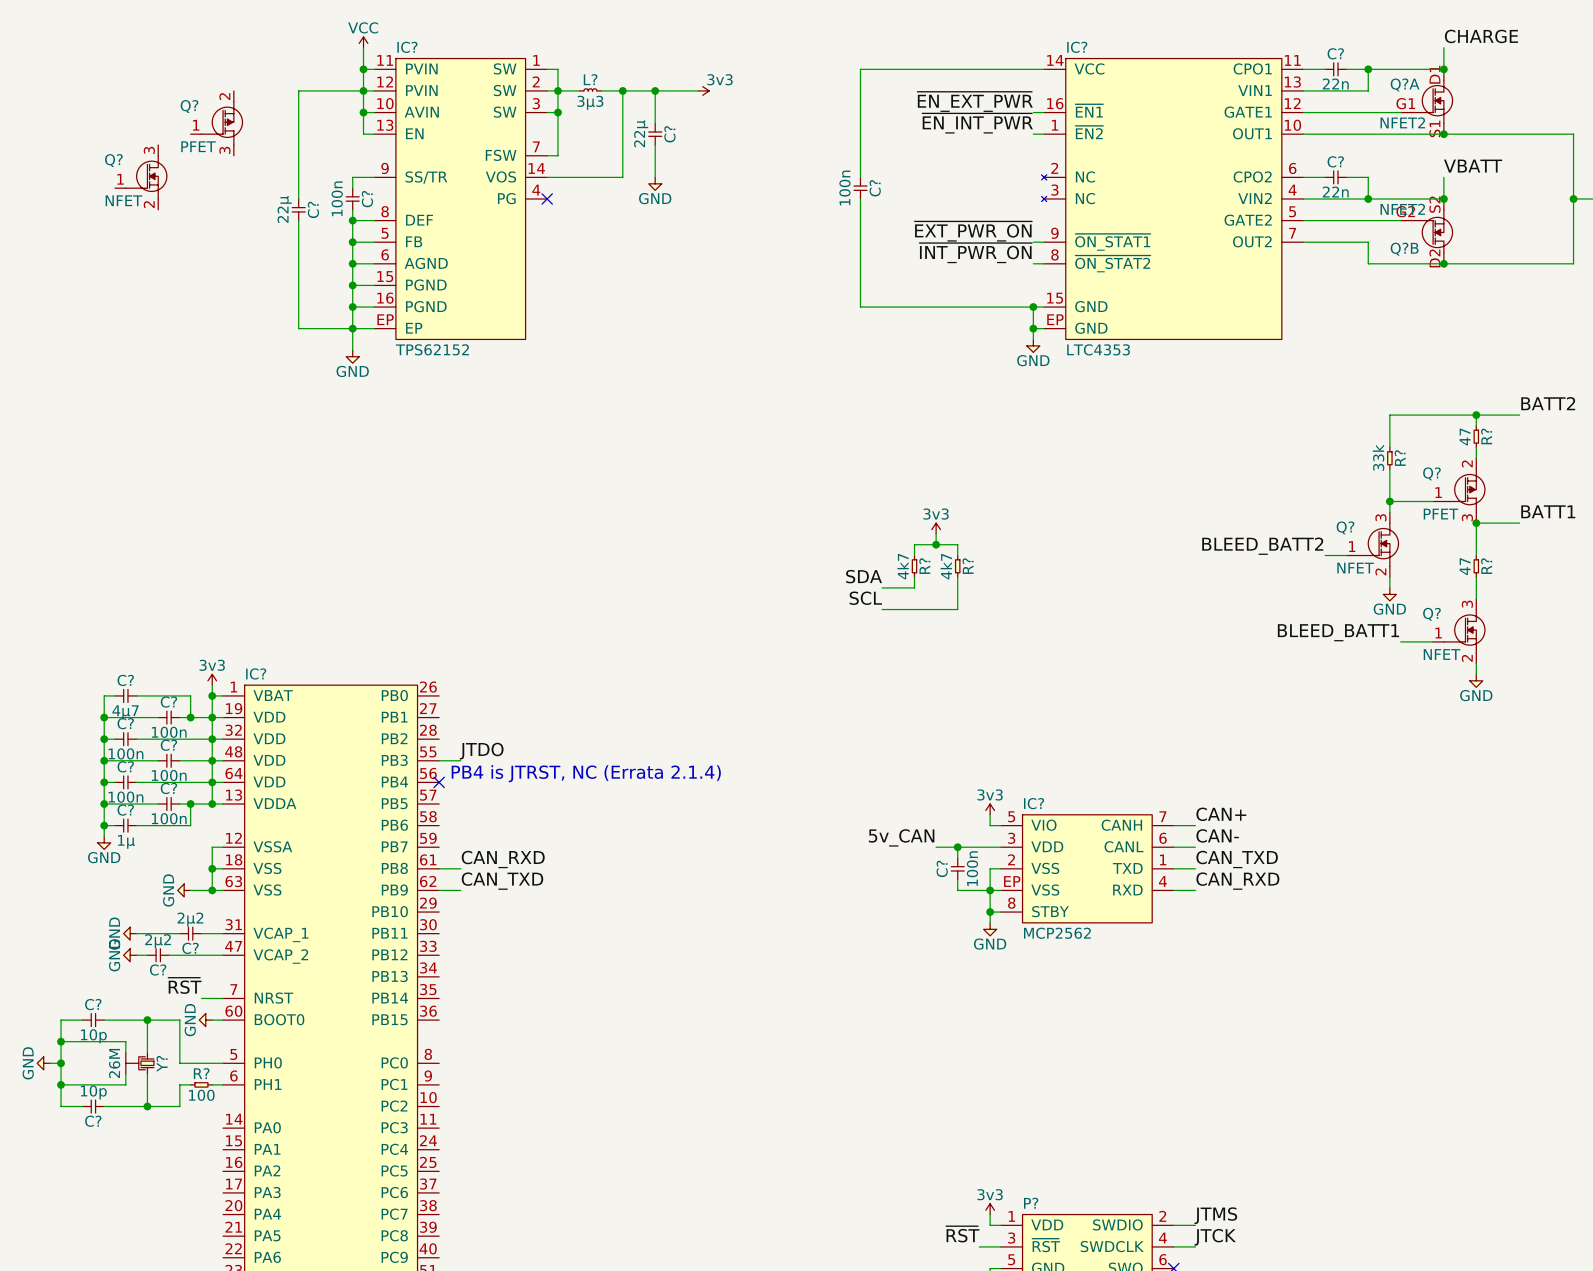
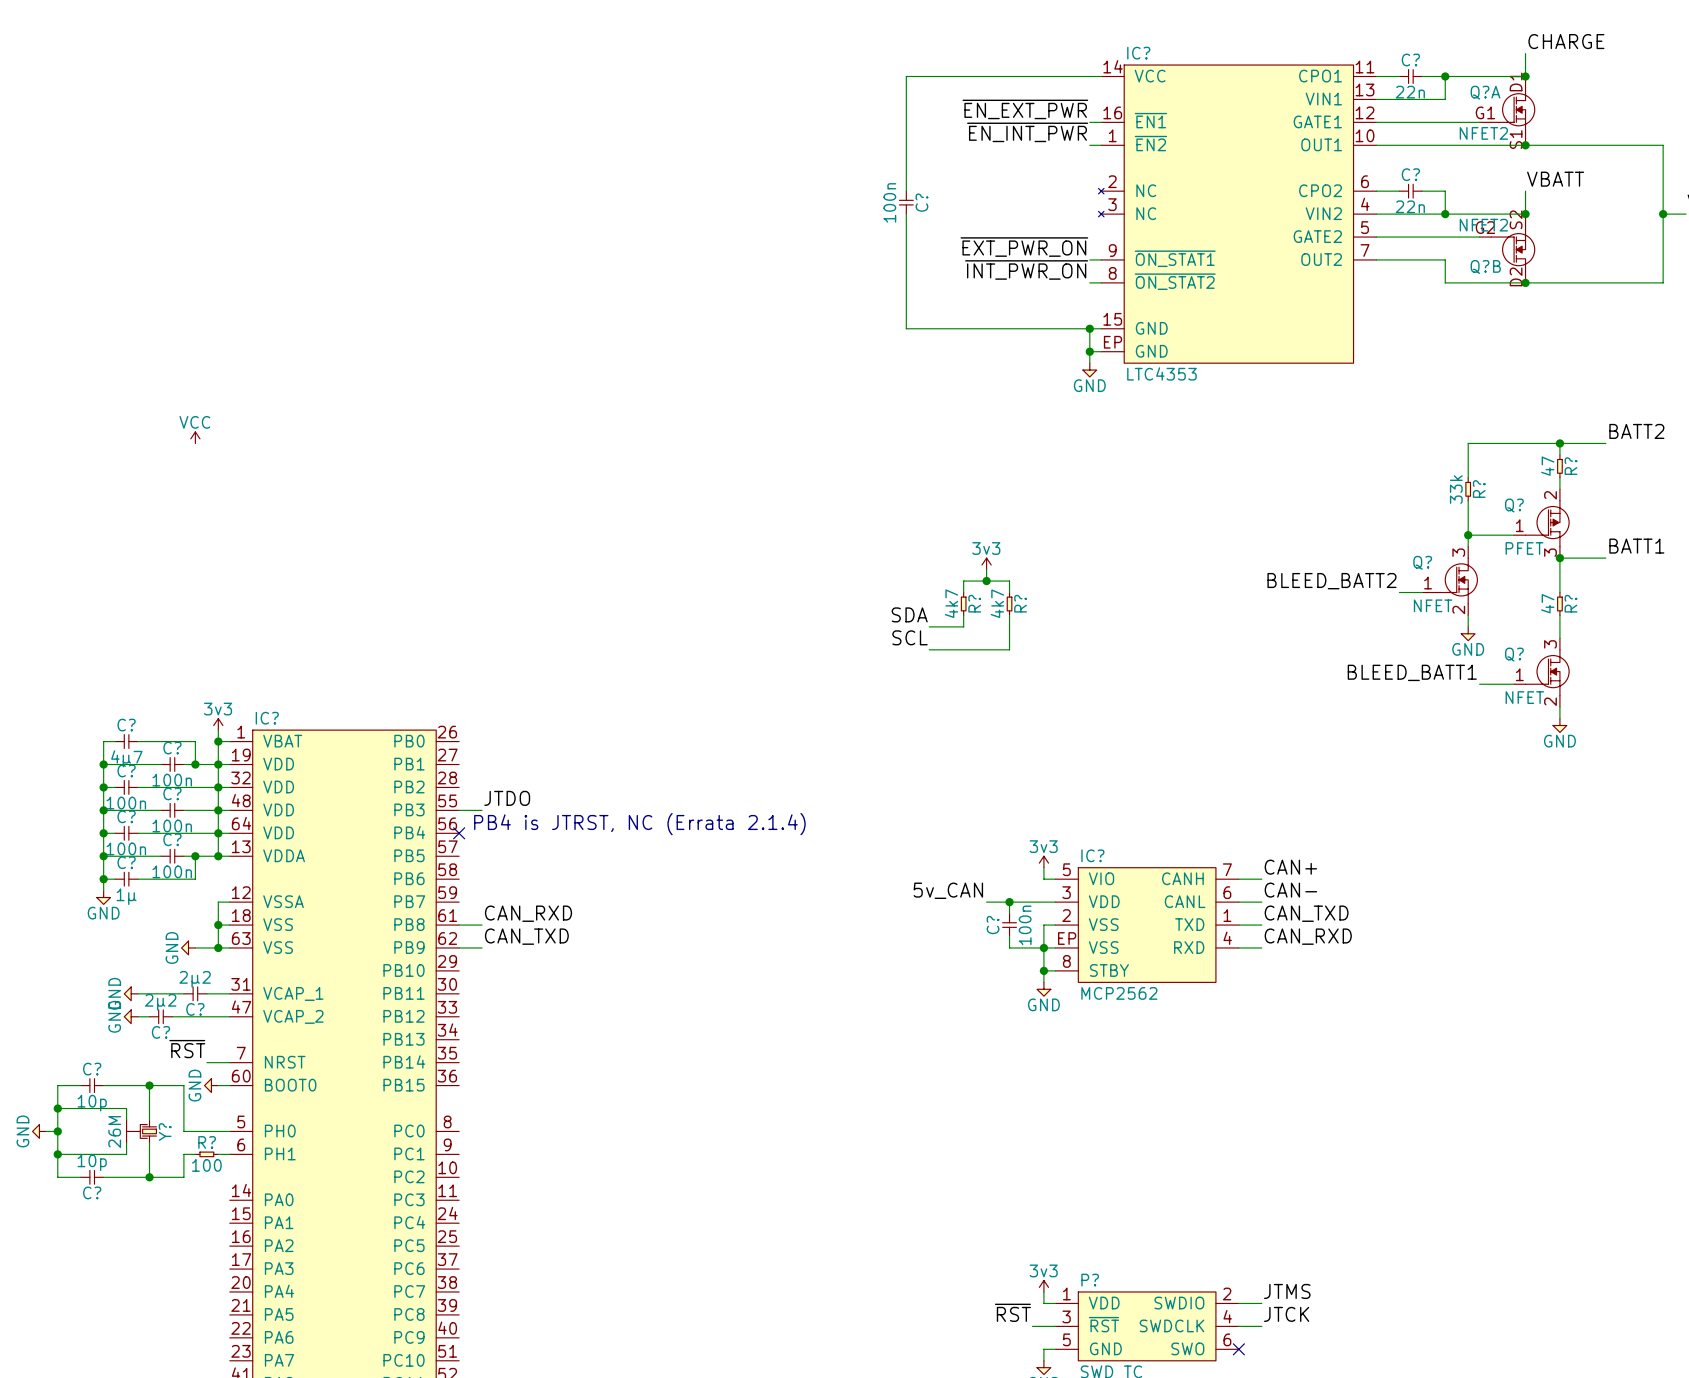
power symbol: VCC (363, 42) -> none
wire: (363, 47) (363, 134) (374, 134) -> none
wire: (363, 69) (374, 69) -> none
junction: (363, 69) -> none
wire: (547, 69) (557, 69) (557, 155) (547, 155) -> none
L?: 3µ3 (590, 89) -> none
junction: (363, 90) -> none
wire: (374, 90) (298, 90) (298, 198) -> none
wire: (547, 90) (579, 90) -> none
junction: (557, 90) -> none
wire: (601, 90) (698, 90) -> none
wire: (622, 90) (622, 177) (547, 177) -> none
junction: (622, 90) -> none
wire: (655, 90) (655, 123) -> none
junction: (655, 90) -> none
power symbol: 3v3 (703, 90) -> none
wire: (363, 112) (374, 112) -> none
junction: (363, 112) -> none
wire: (547, 112) (557, 112) -> none
junction: (557, 112) -> none
Q?: PFET (216, 123) -> none
C?: 22µ (655, 134) -> none
wire: (655, 144) (655, 177) -> none
Q?: NFET (140, 177) -> none
wire: (374, 177) (352, 177) (352, 188) -> none
power symbol: GND (655, 183) -> none
C?: 100n (352, 198) -> none
IC?: TPS62152 (460, 198) -> none
no-connect mark: (547, 198) -> none
C?: 22µ (298, 209) -> none
wire: (352, 209) (352, 350) -> none
wire: (298, 220) (298, 328) (374, 328) -> none
wire: (352, 220) (374, 220) -> none
junction: (352, 220) -> none
wire: (352, 242) (374, 242) -> none
junction: (352, 242) -> none
wire: (352, 263) (374, 263) -> none
junction: (352, 263) -> none
wire: (352, 285) (374, 285) -> none
junction: (352, 285) -> none
wire: (352, 307) (374, 307) -> none
junction: (352, 307) -> none
junction: (352, 328) -> none
power symbol: GND (352, 356) -> none
power symbol: none -> VCC (195, 437)

